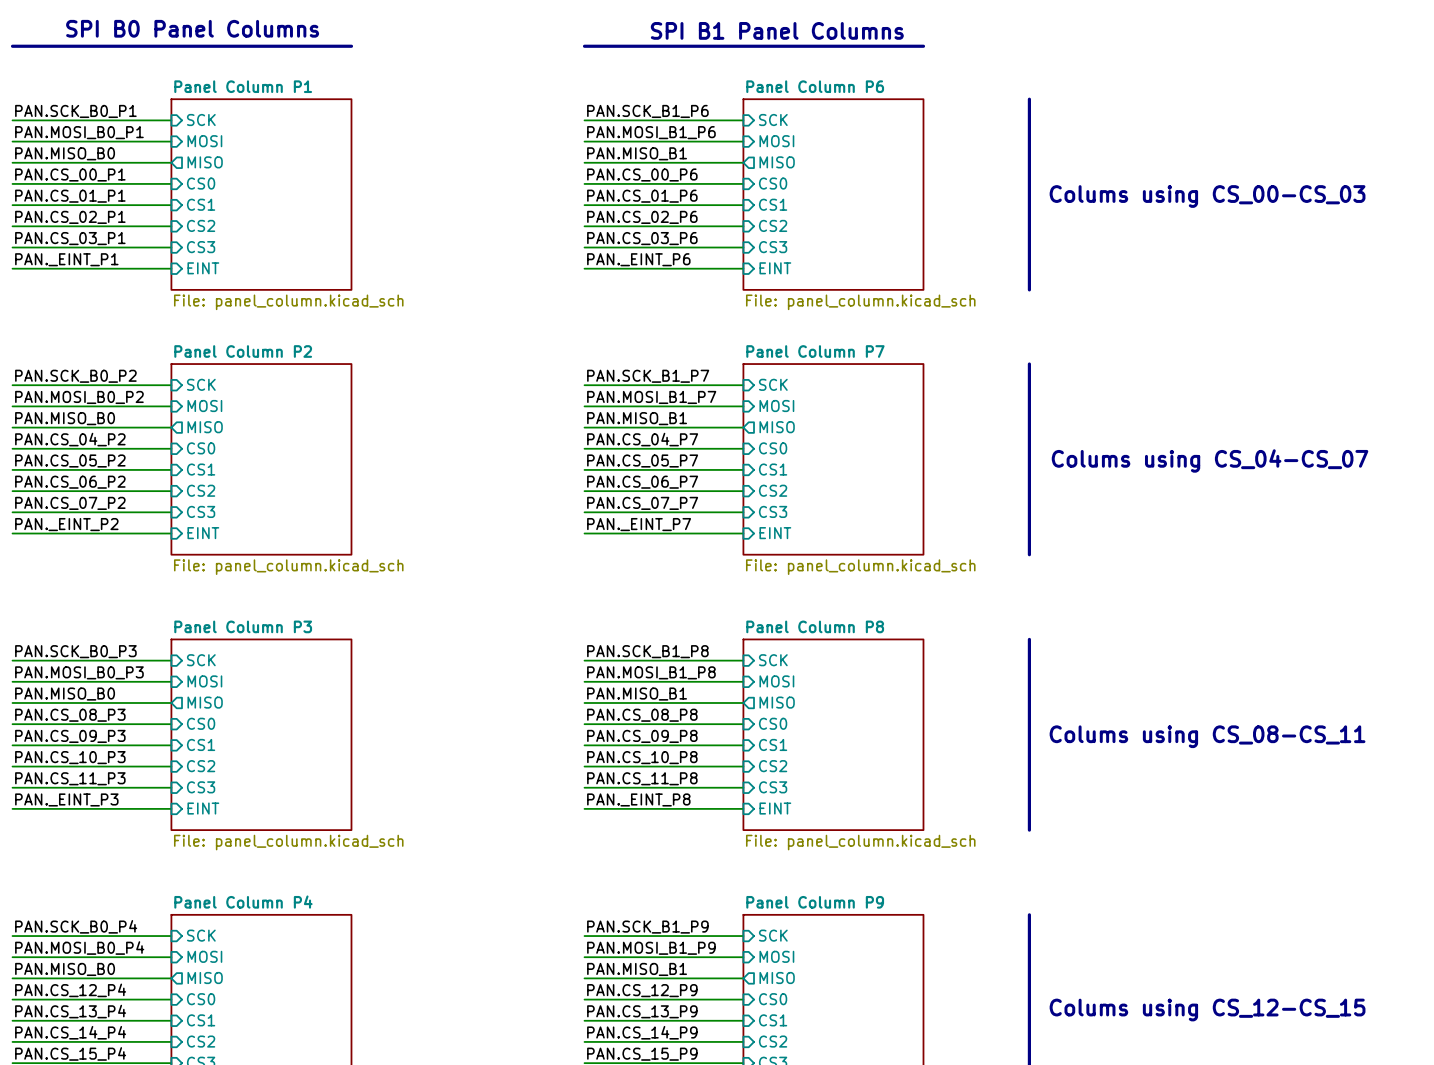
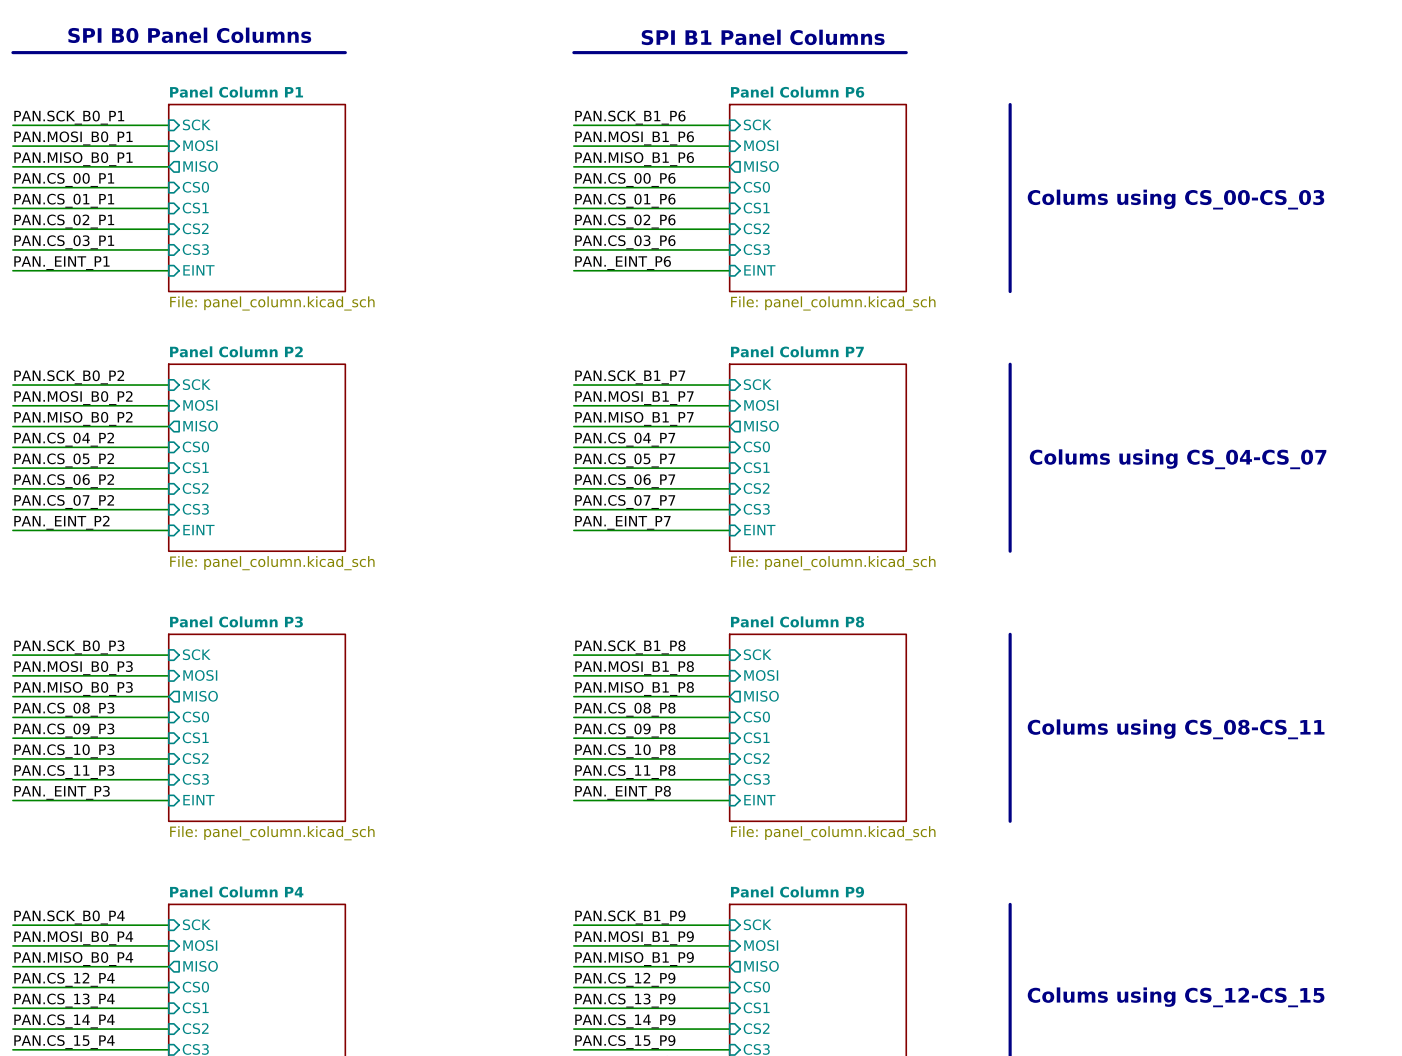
label: PAN.MISO_B0 (65, 153) -> PAN.MISO_B0_P1 (73, 159)
label: PAN.MISO_B1 (637, 153) -> PAN.MISO_B1_P6 (634, 159)
label: PAN.MISO_B0 (65, 418) -> PAN.MISO_B0_P2 (73, 418)
label: PAN.MISO_B1 (637, 418) -> PAN.MISO_B1_P7 (634, 418)
label: PAN.MISO_B0 (65, 694) -> PAN.MISO_B0_P3 (73, 688)
label: PAN.MISO_B1 (637, 694) -> PAN.MISO_B1_P8 (634, 688)
label: PAN.MISO_B0 (65, 969) -> PAN.MISO_B0_P4 (73, 959)
label: PAN.MISO_B1 (637, 969) -> PAN.MISO_B1_P9 (634, 959)

